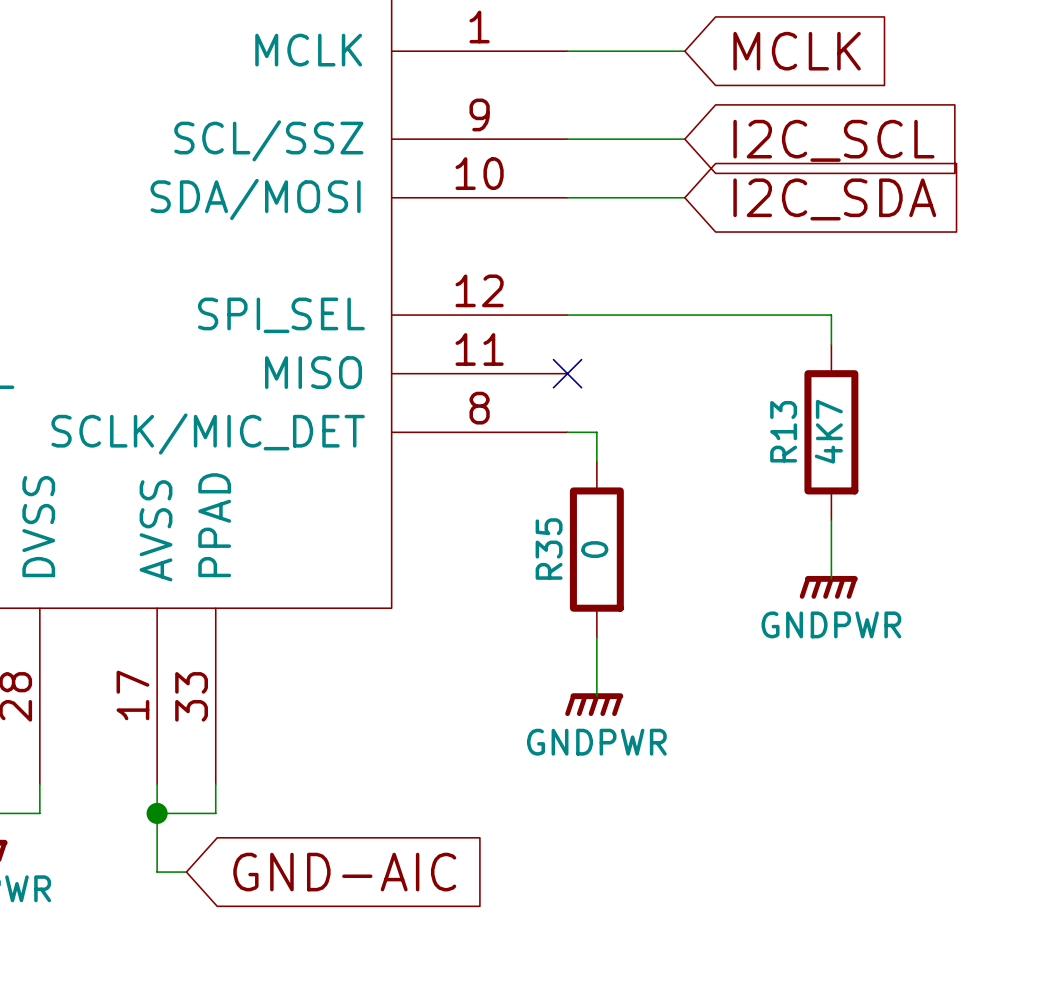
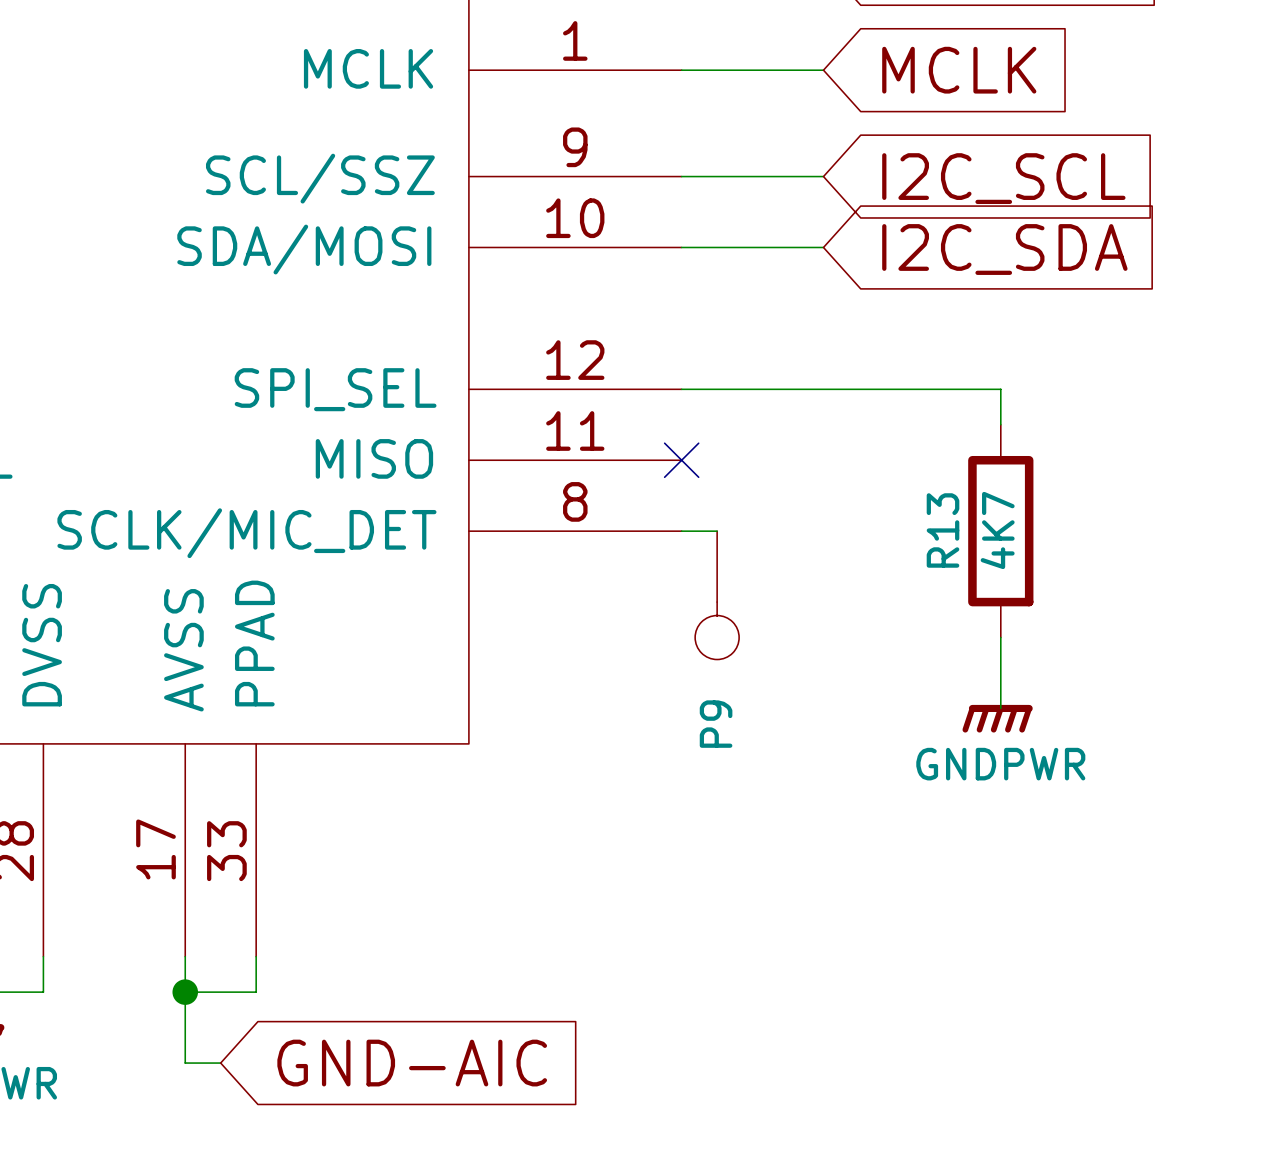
P9: none -> (717, 595)
R35: 0 (596, 549) -> none
wire: (596, 637) (596, 696) -> none
power symbol: GNDPWR (594, 704) -> none

